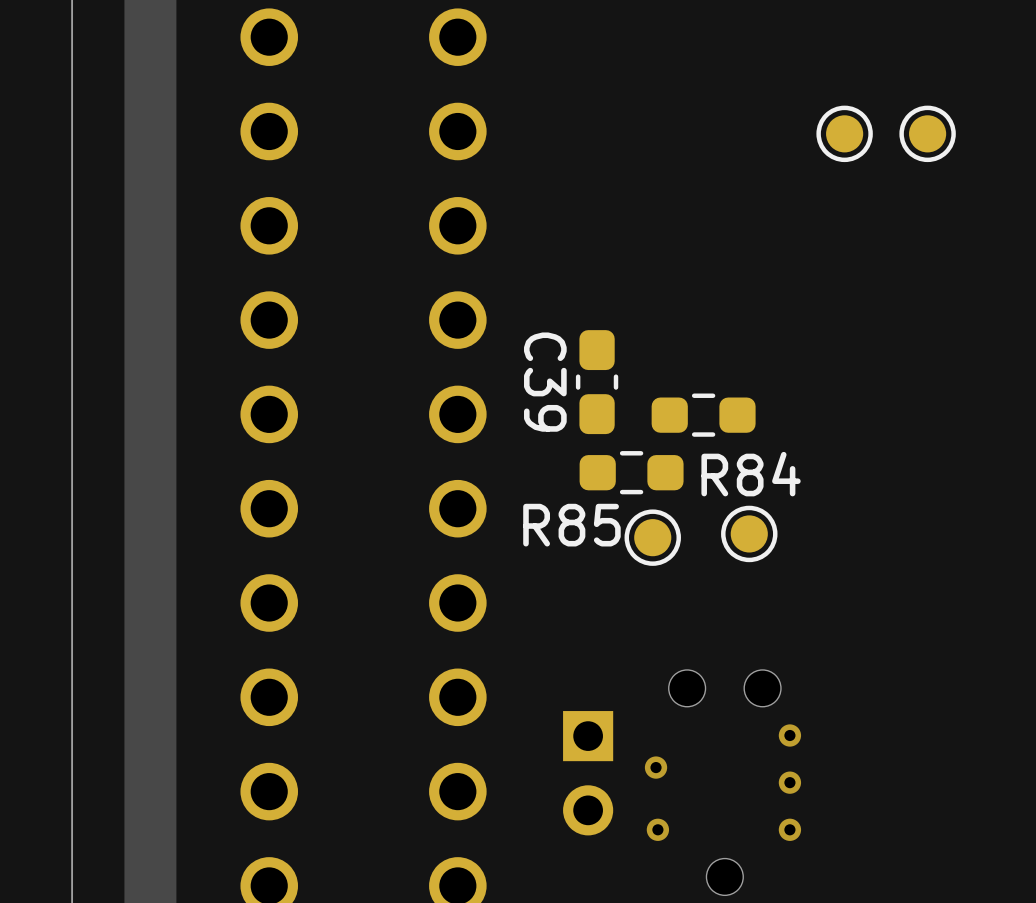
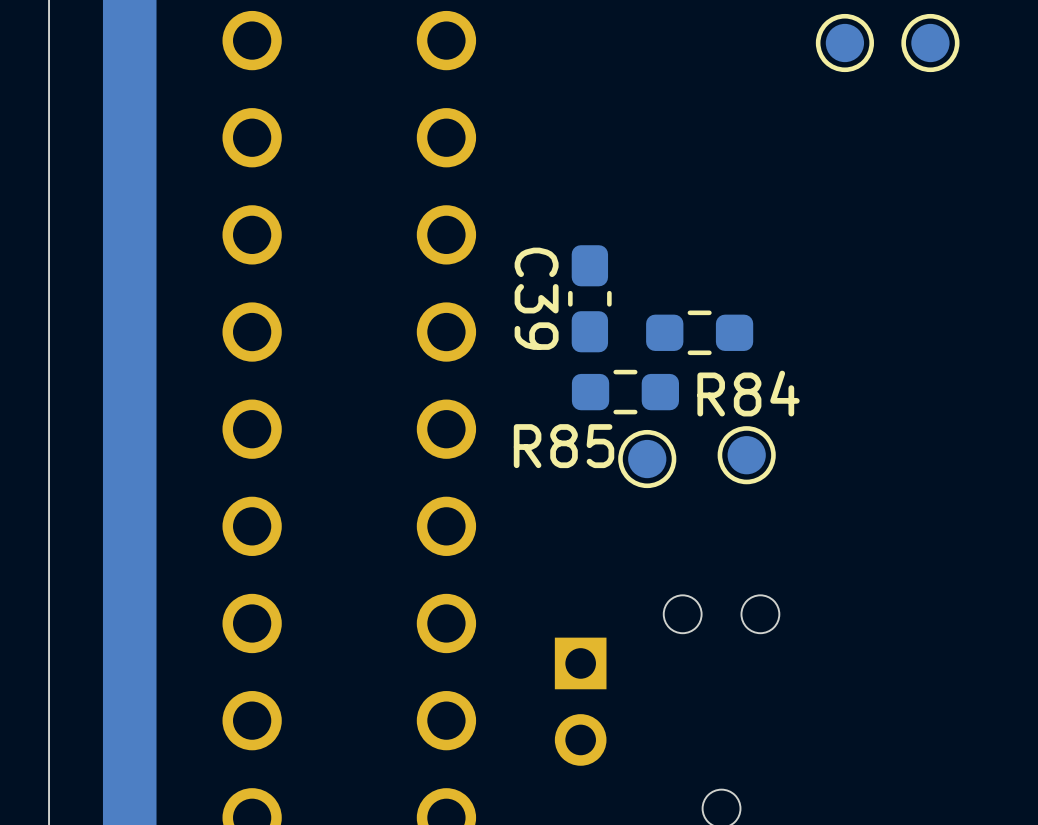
via: (789, 735) -> none
via: (656, 767) -> none
via: (789, 782) -> none
via: (657, 829) -> none
via: (789, 829) -> none

